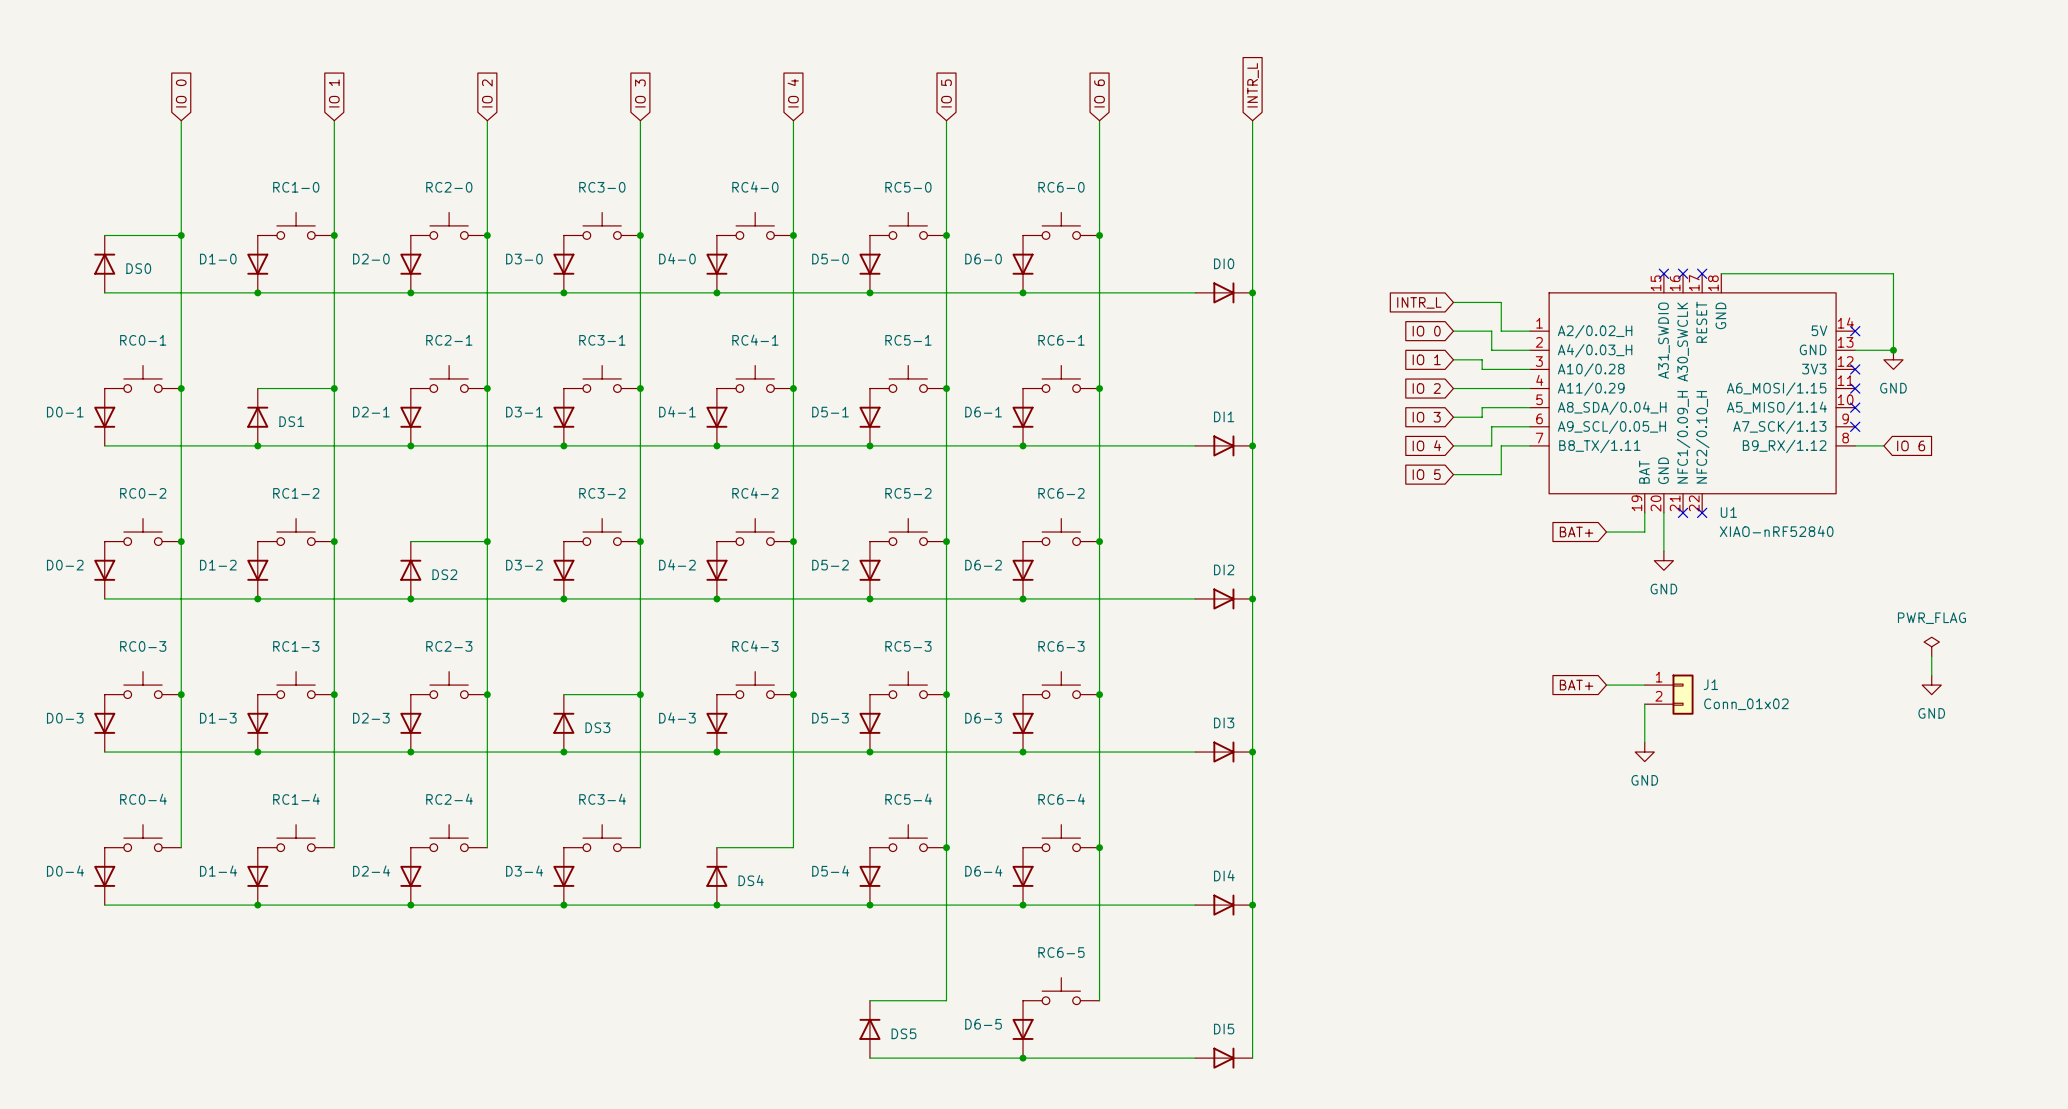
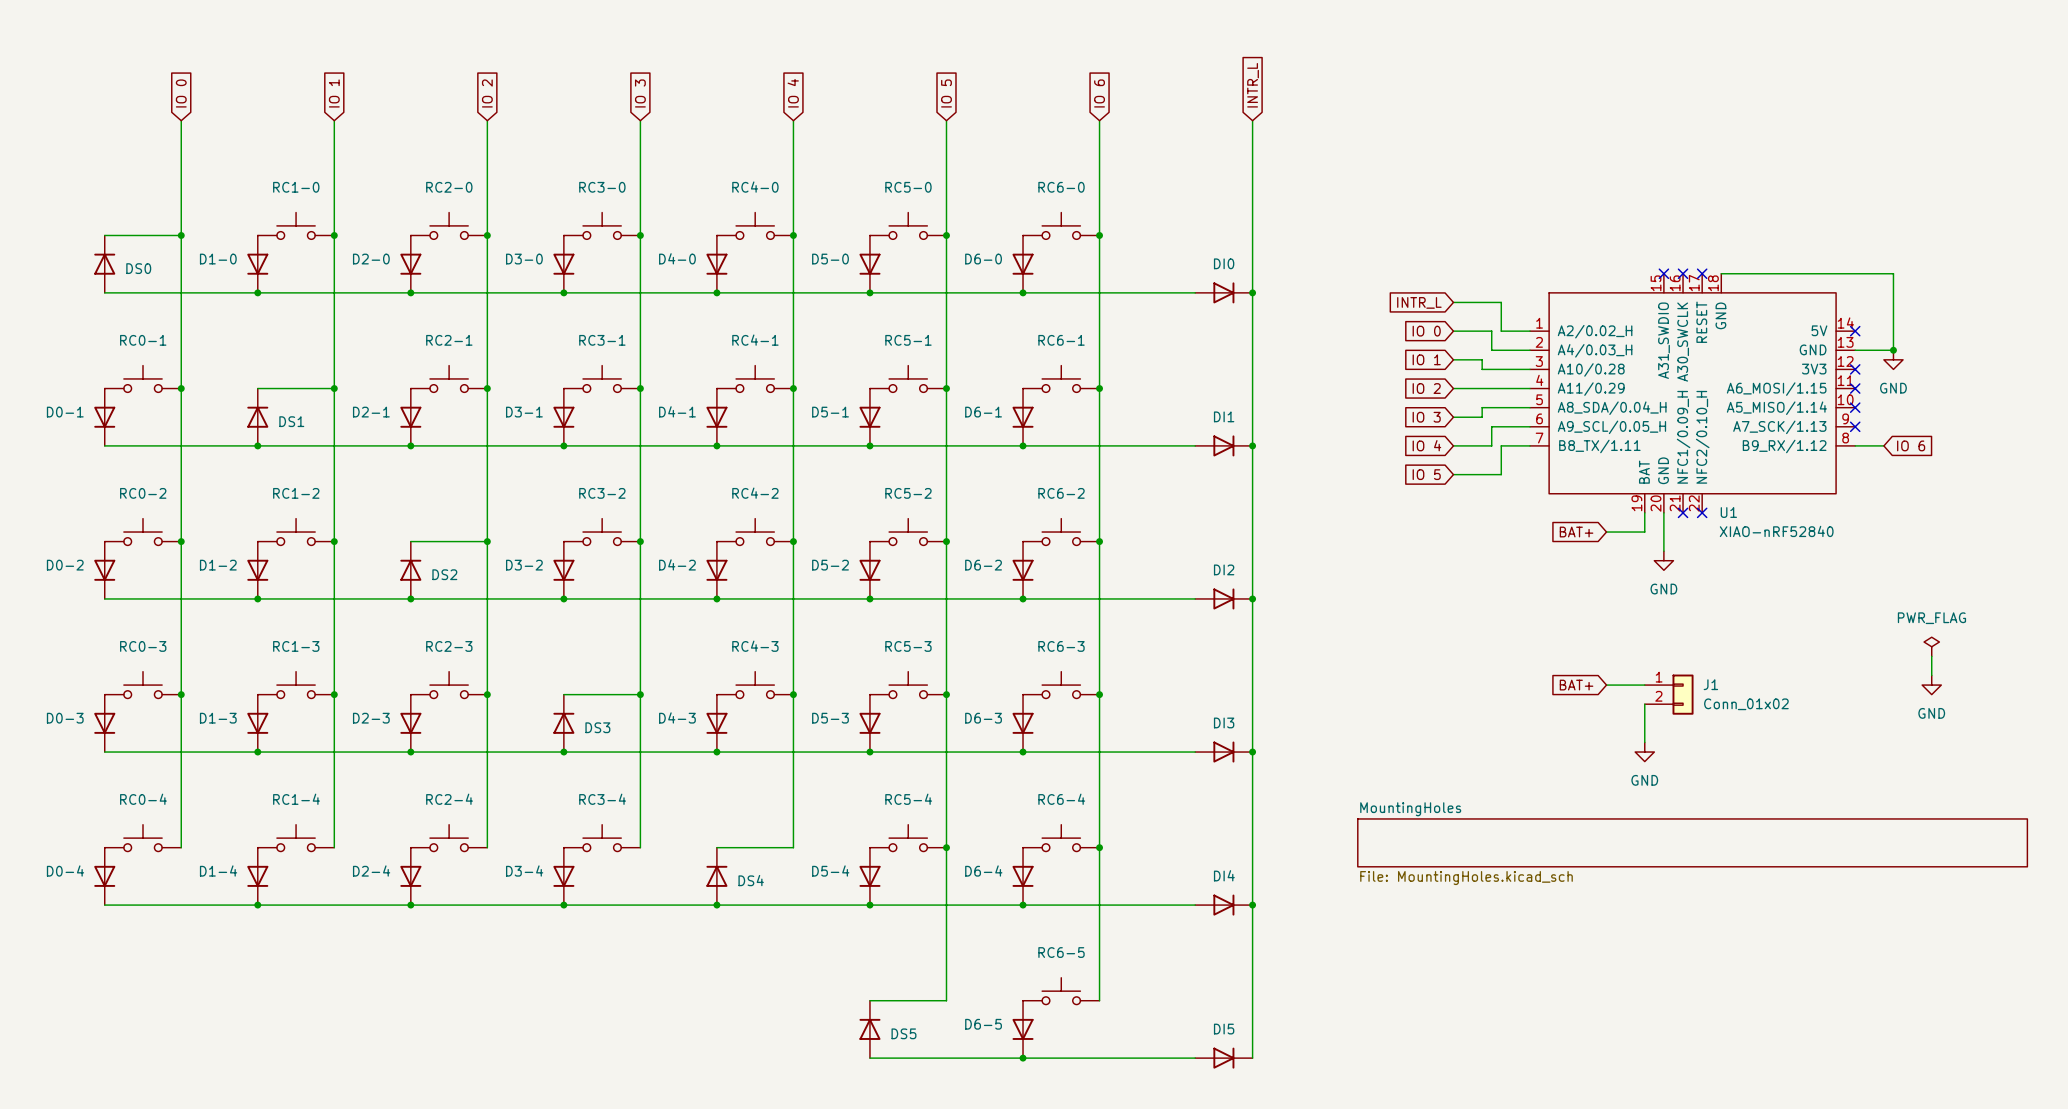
sheet MountingHoles: none -> File: MountingHoles.kicad_sch (1692, 842)

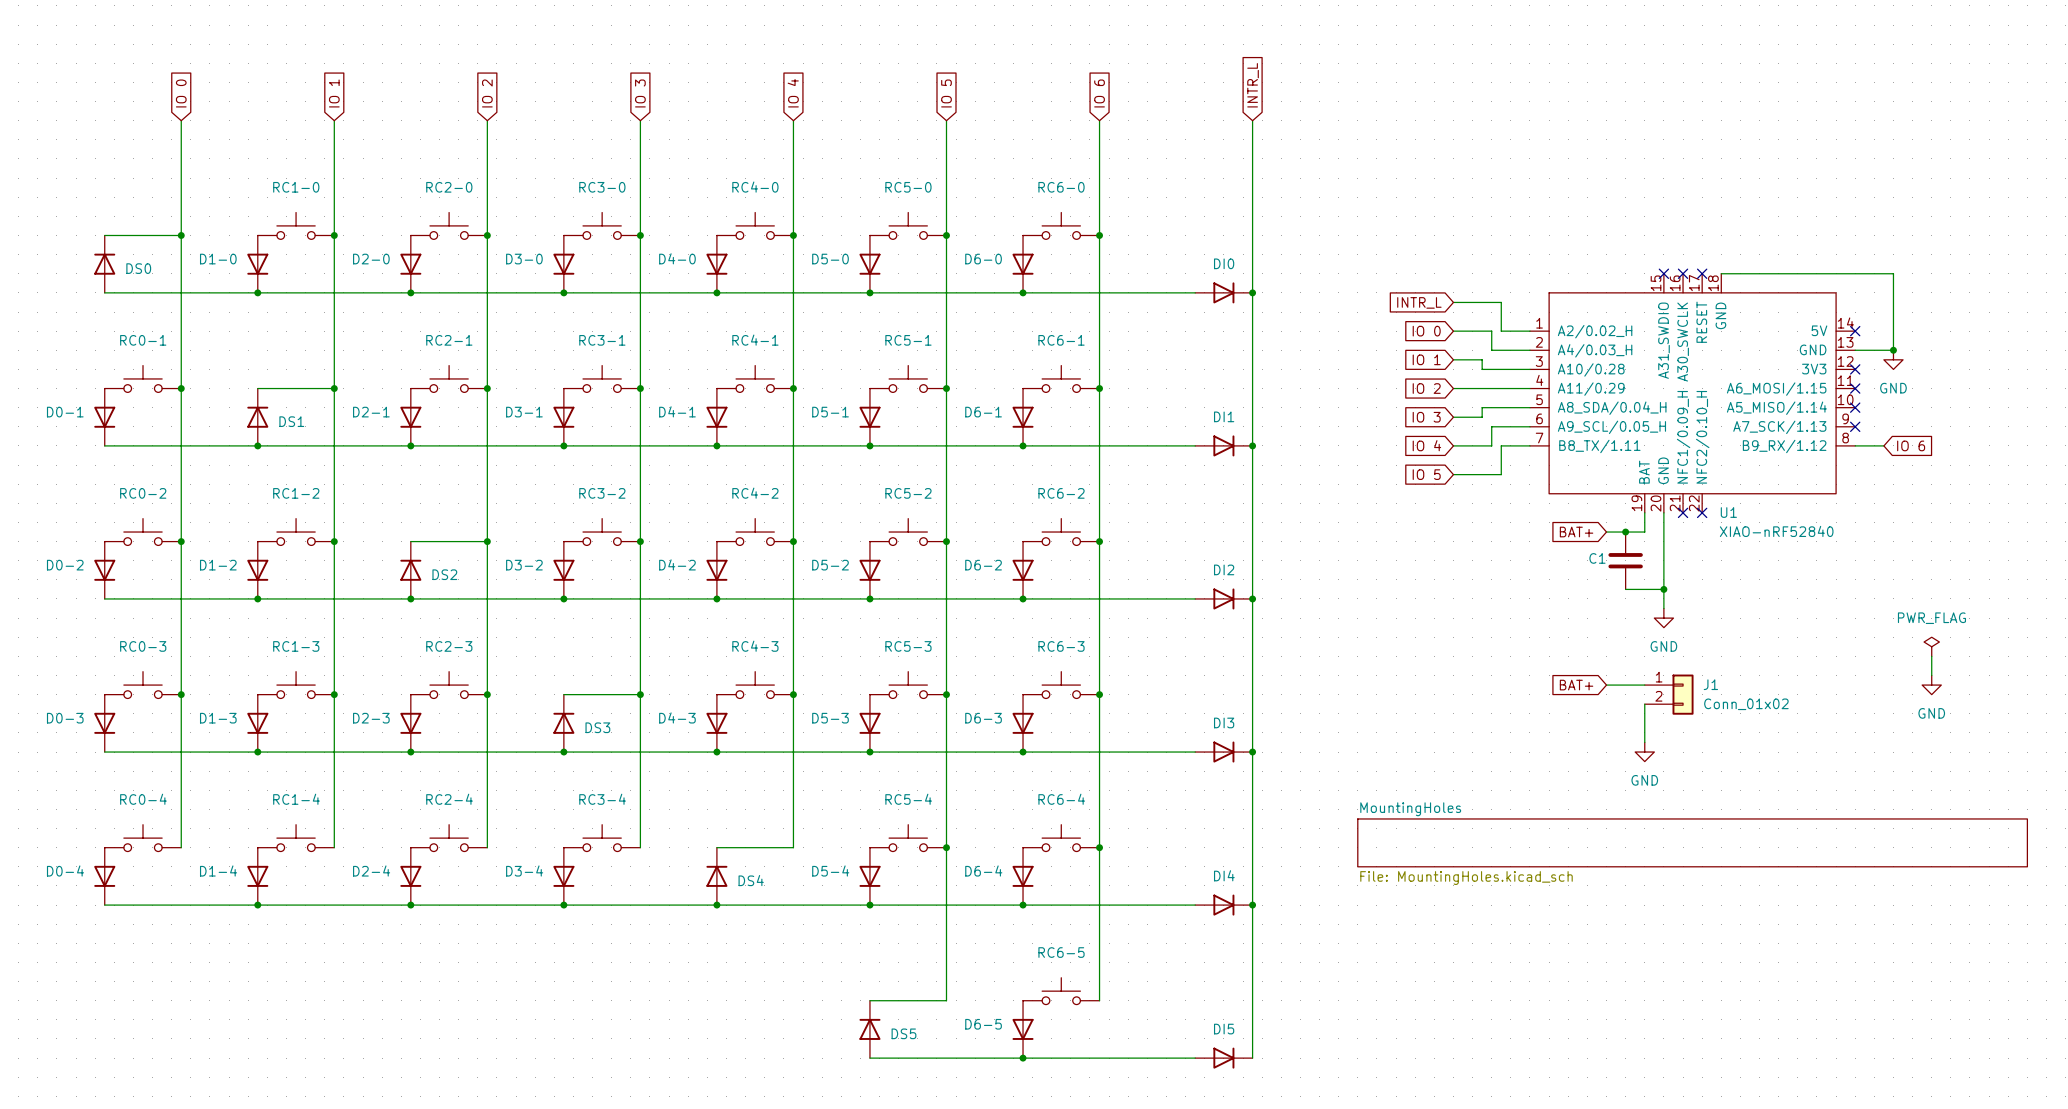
junction: none -> (1625, 532)
wire: none -> (1663, 551) (1663, 608)
C1: none -> (1625, 560)
power symbol position: GND (1663, 560) -> GND (1663, 618)
wire: none -> (1625, 589) (1663, 589)
junction: none -> (1663, 589)

